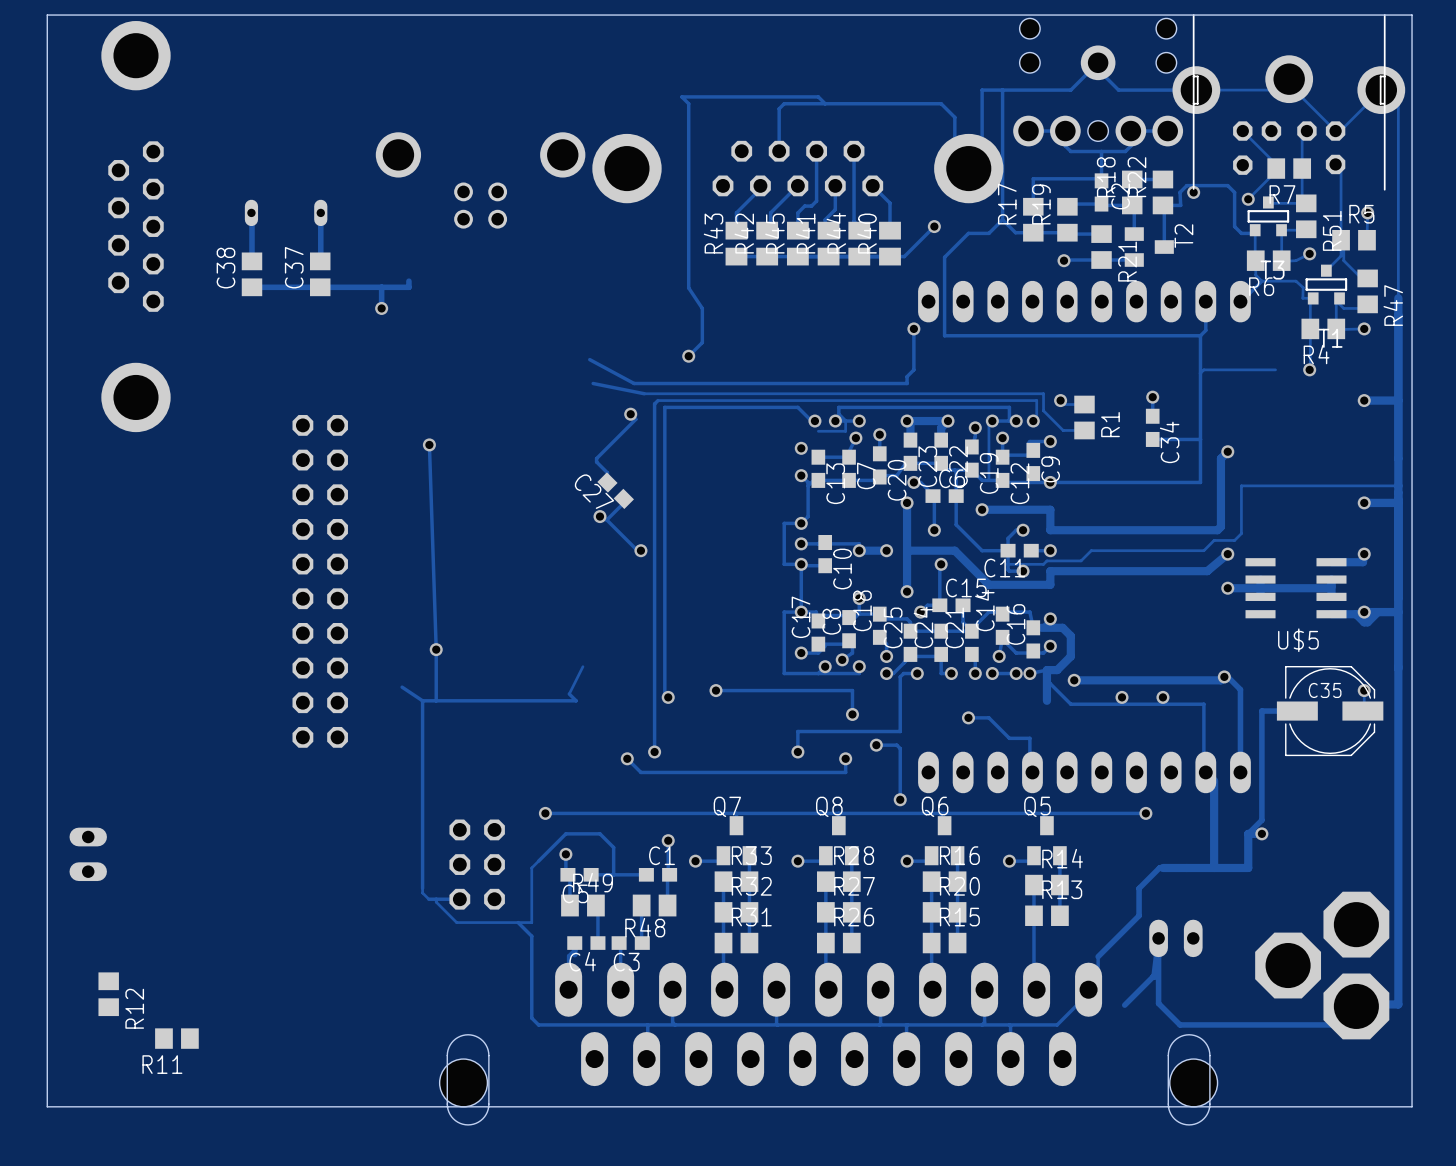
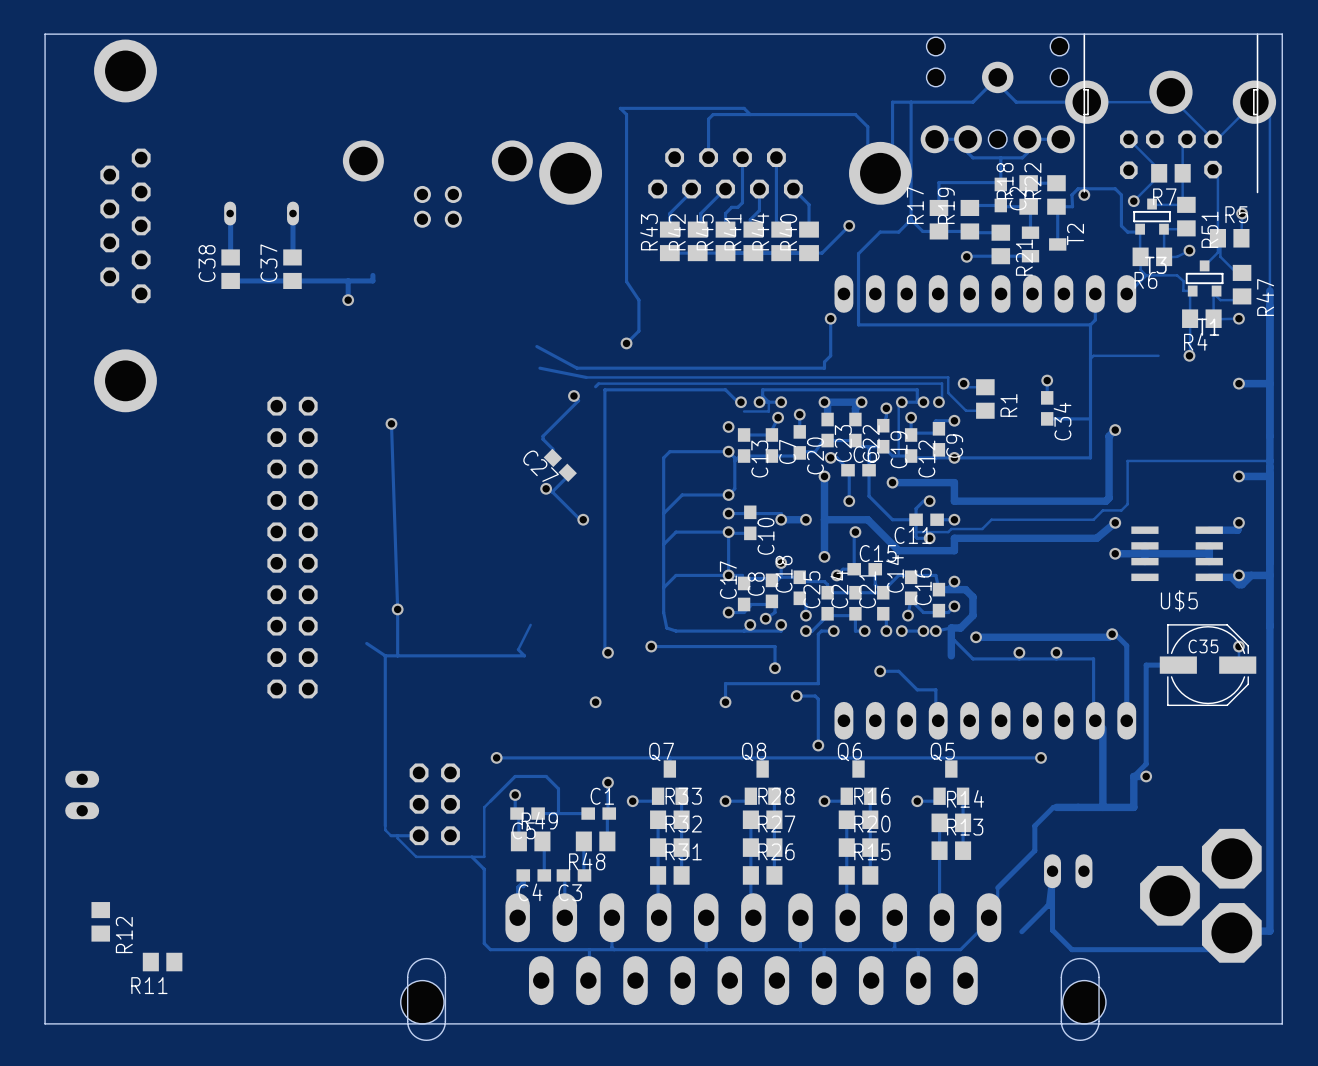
track: (654, 403) (654, 751) -> none
track: none -> (728, 451) (669, 451) (663, 457) (663, 612) (666, 627) (676, 631) (713, 631)
track: (784, 523) (784, 564) -> (713, 494) (682, 494) (663, 513)
track: none -> (713, 532) (676, 532) (663, 544)
track: (784, 612) (784, 673) -> (713, 575) (676, 575) (663, 587)
via: (627, 758) -> none
track: (845, 758) (845, 772) (640, 772) (627, 758) -> none
via: (845, 758) -> none

